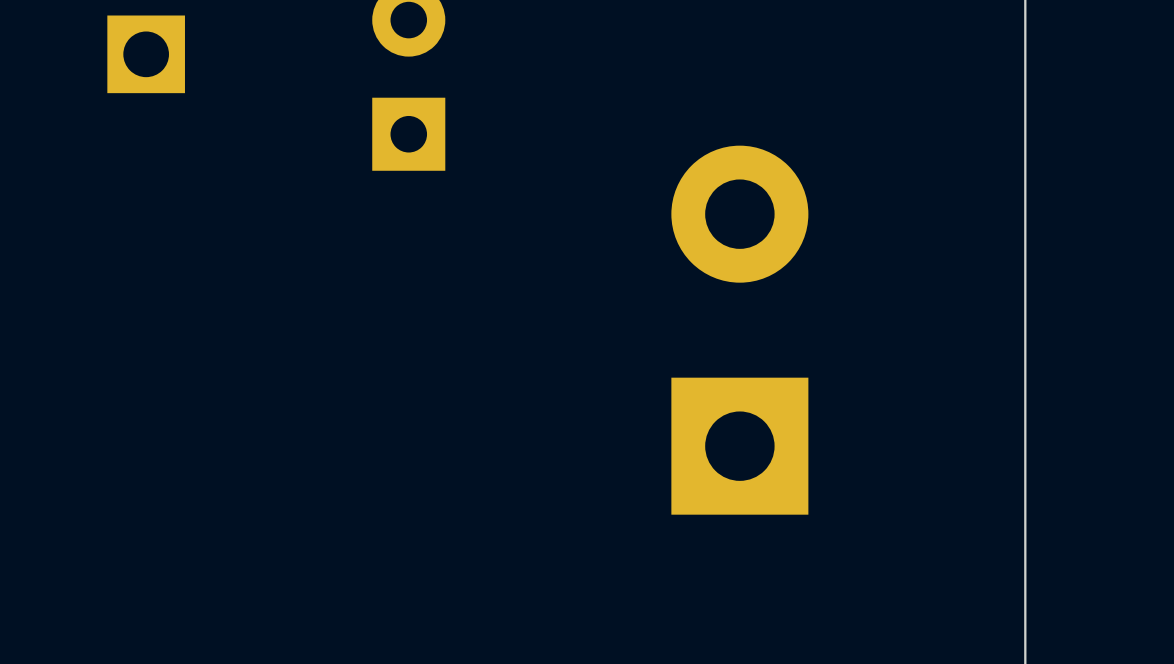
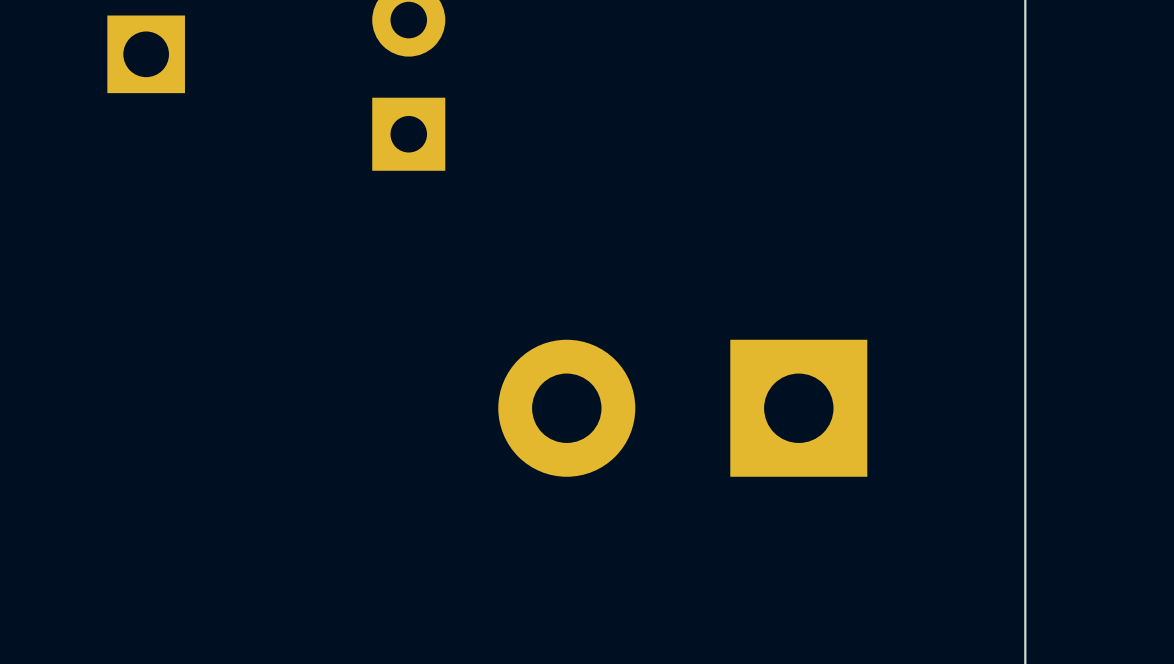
part rotation: 0° (739, 330) -> 90° counterclockwise (682, 408)

